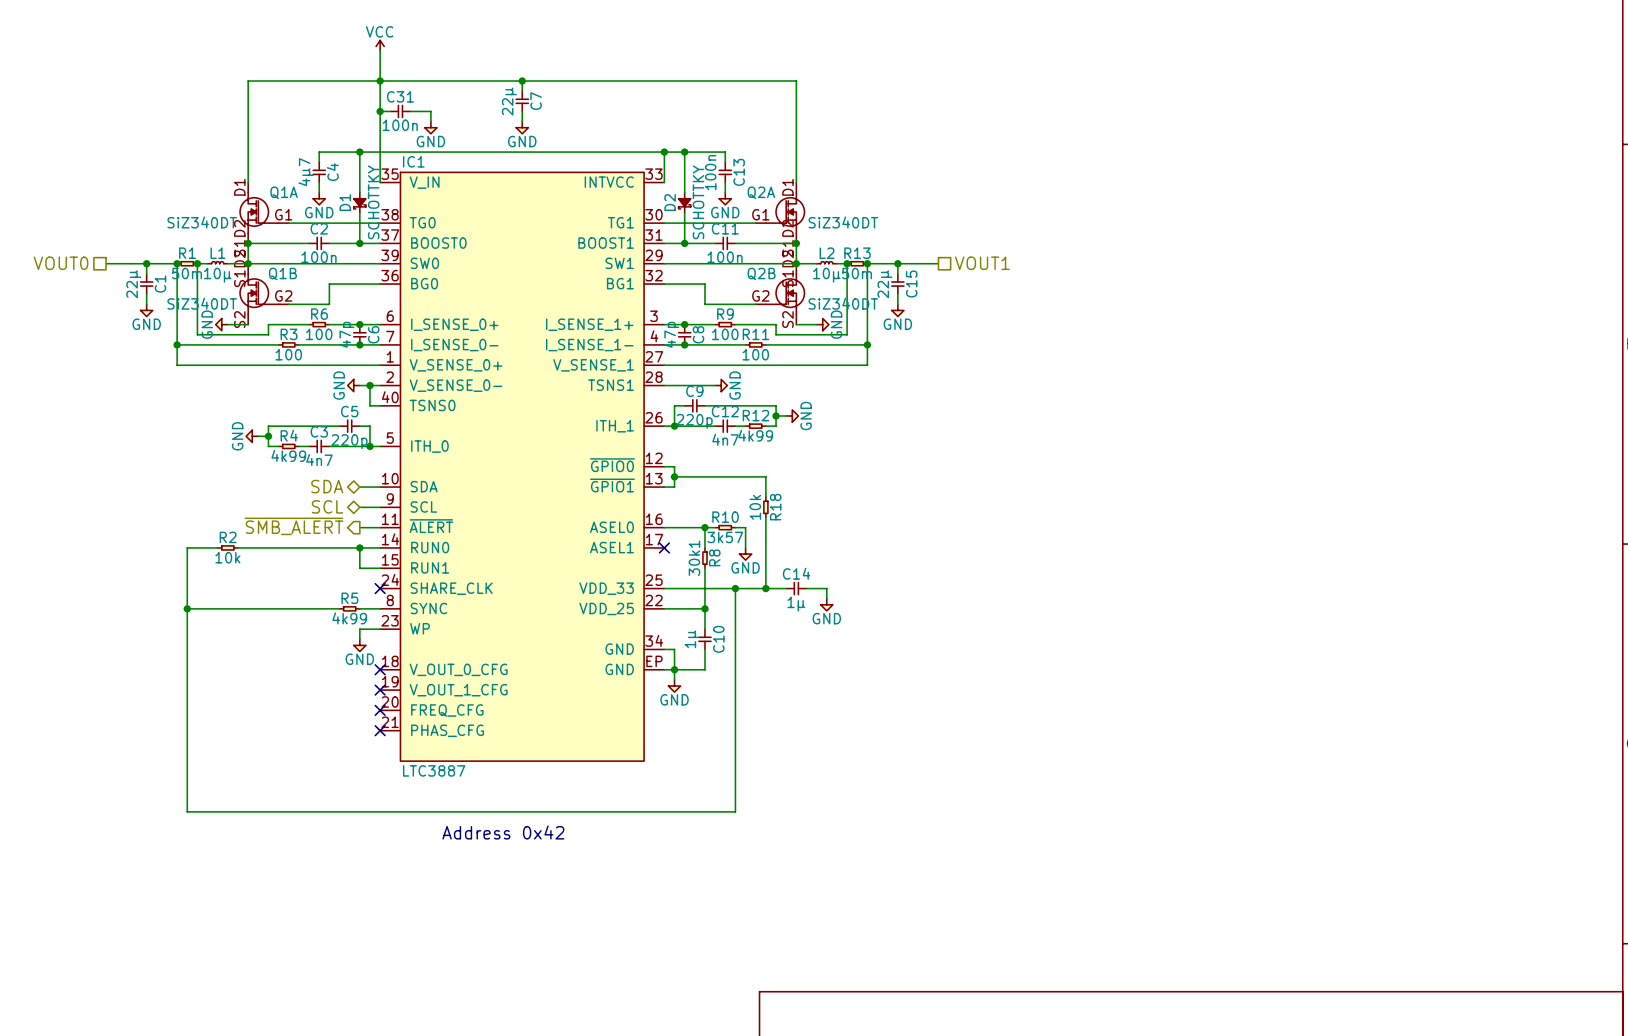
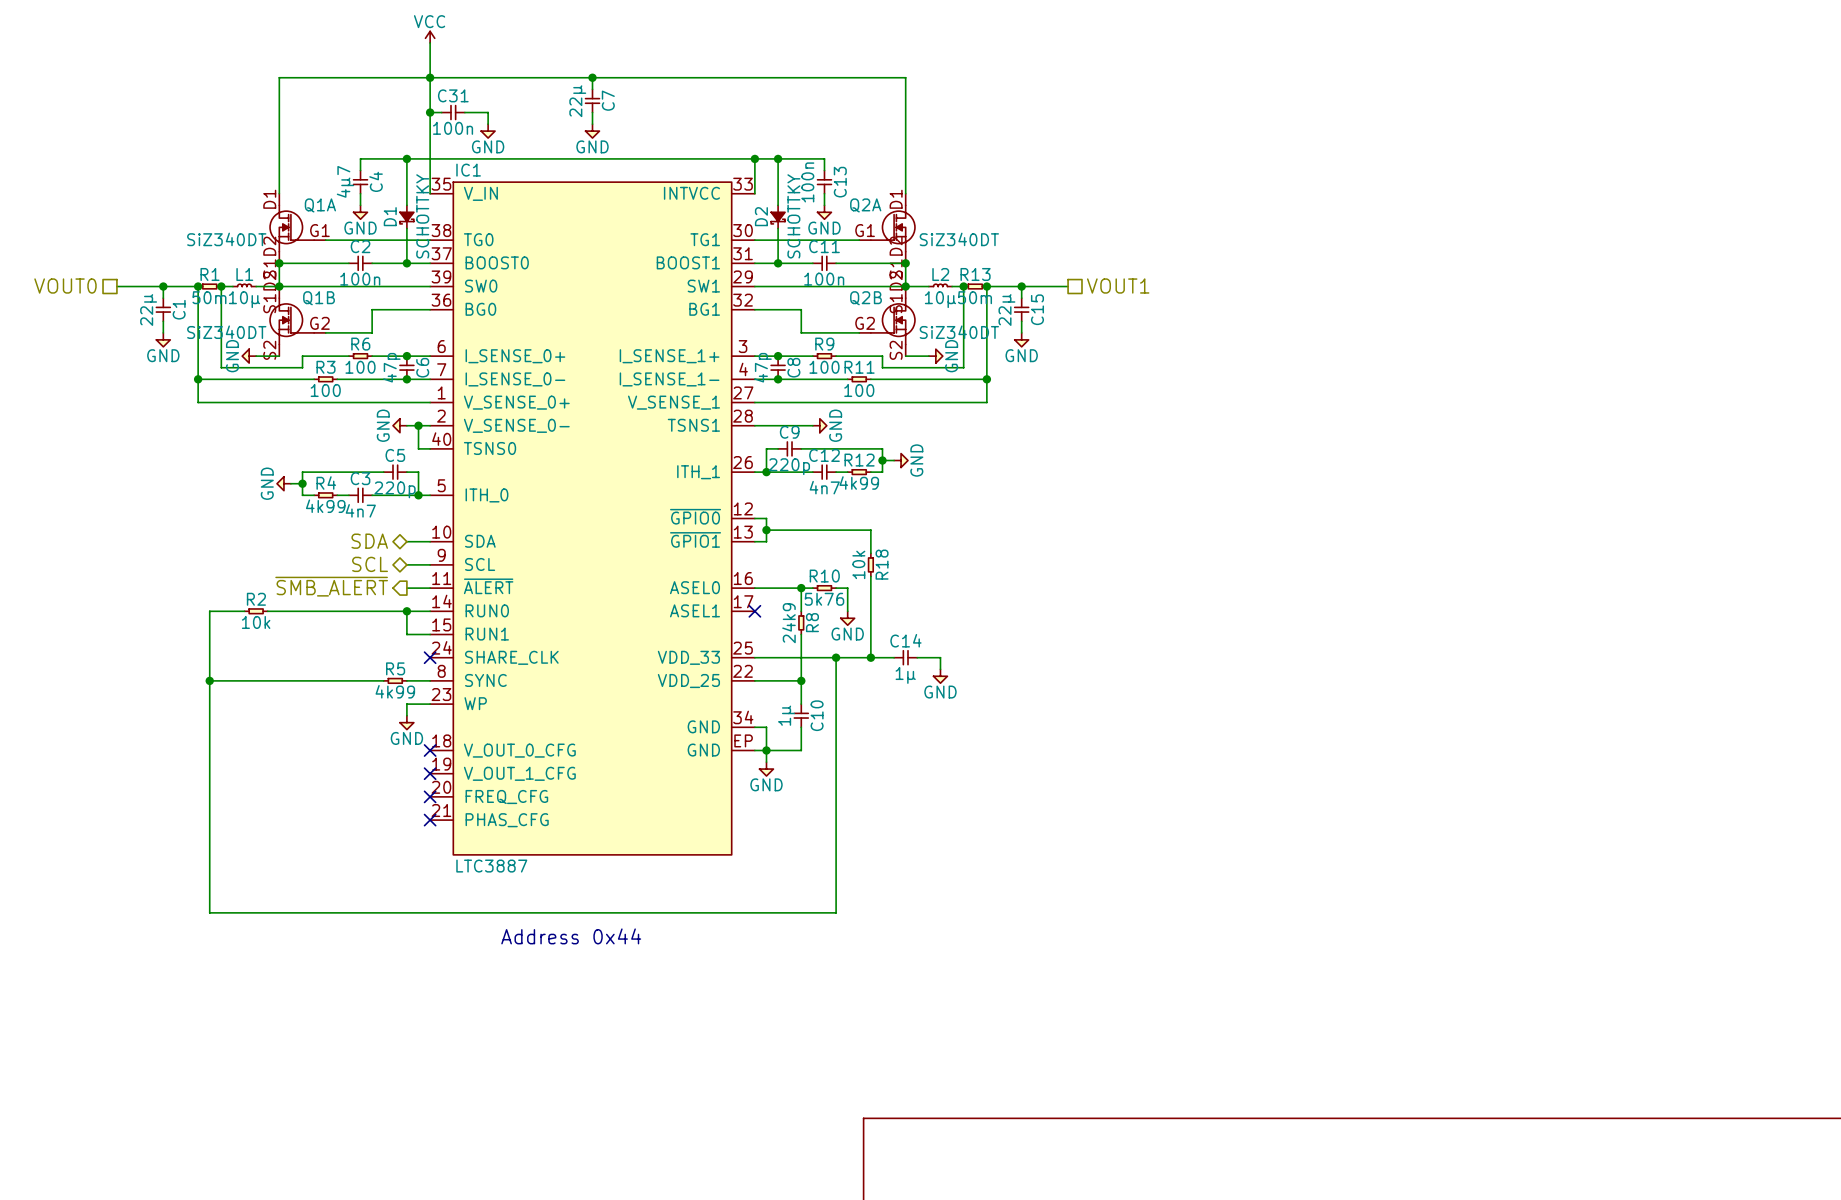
R10 value: 3k57 (725, 537) -> 5k76 (824, 599)
R8 value: 30k1 (694, 558) -> 24k9 (788, 623)
text: Address 0x42 (503, 832) -> Address 0x44 (571, 936)

